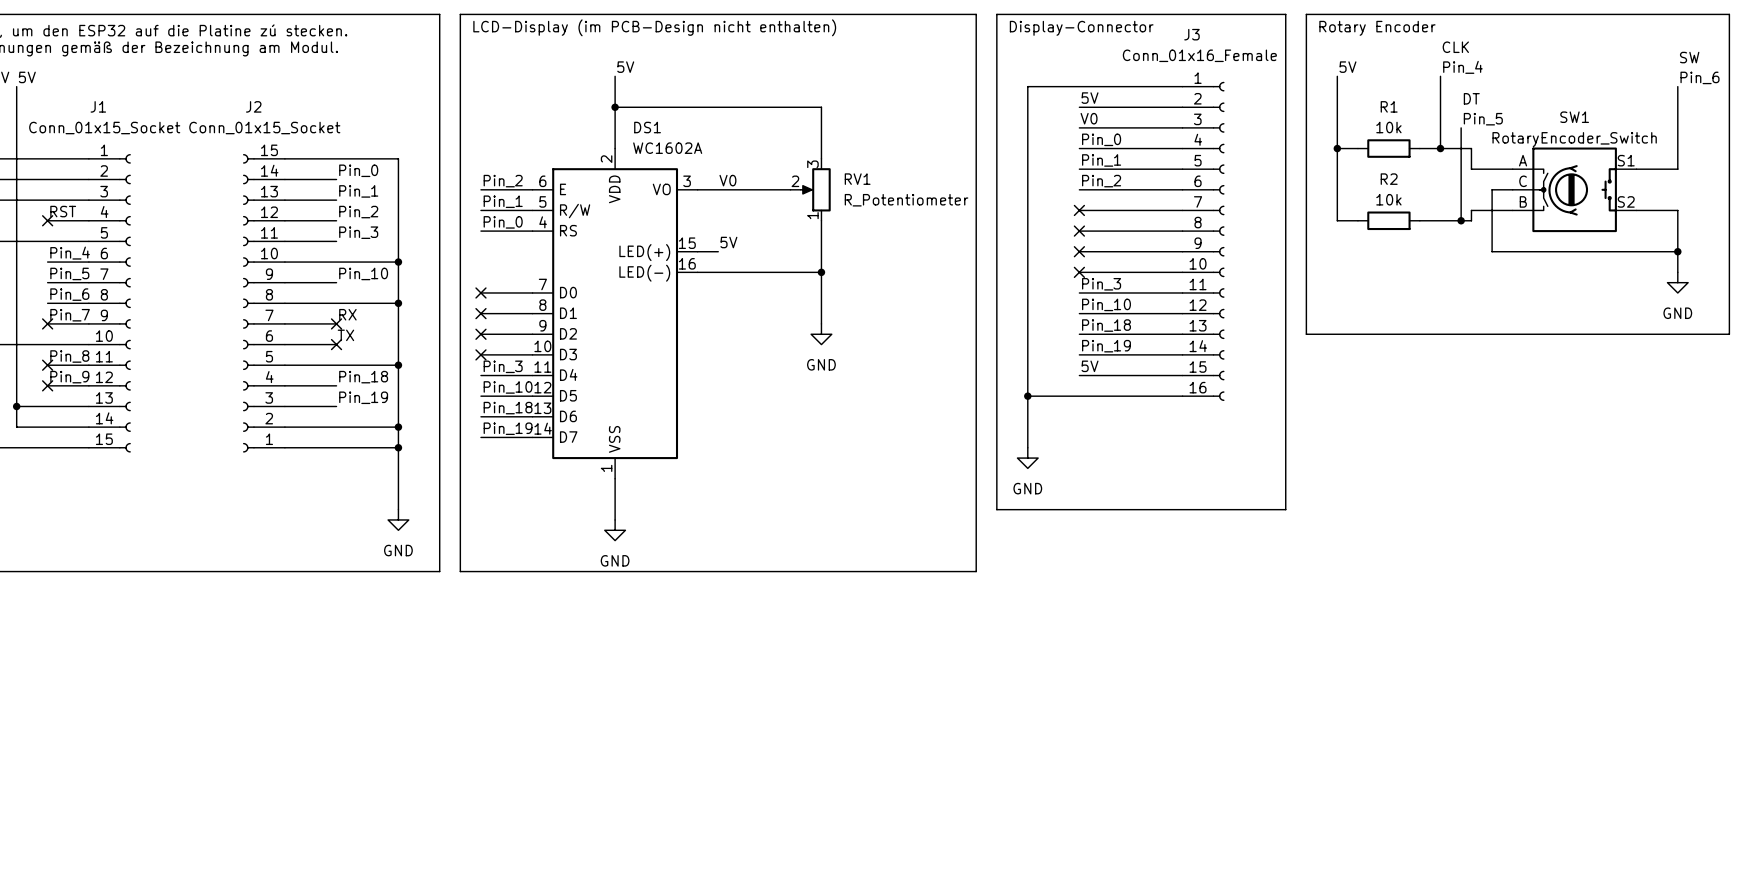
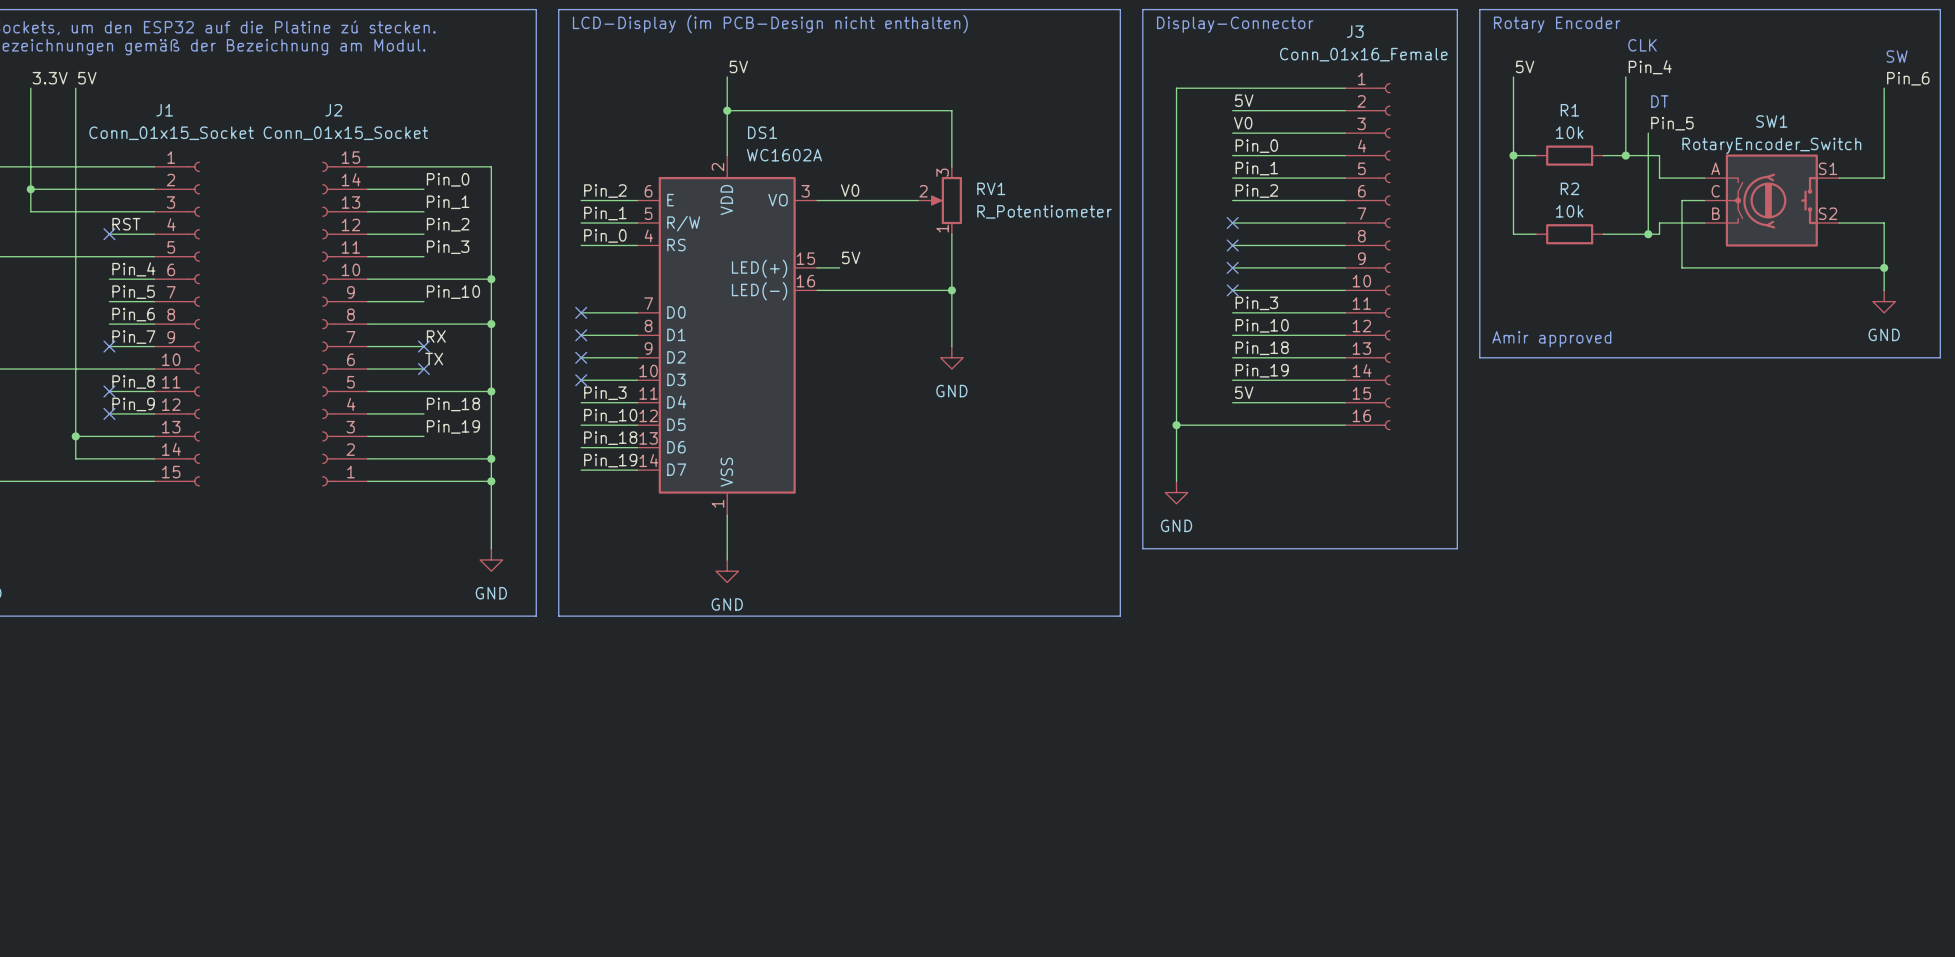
text: none -> Amir approved (1551, 339)

